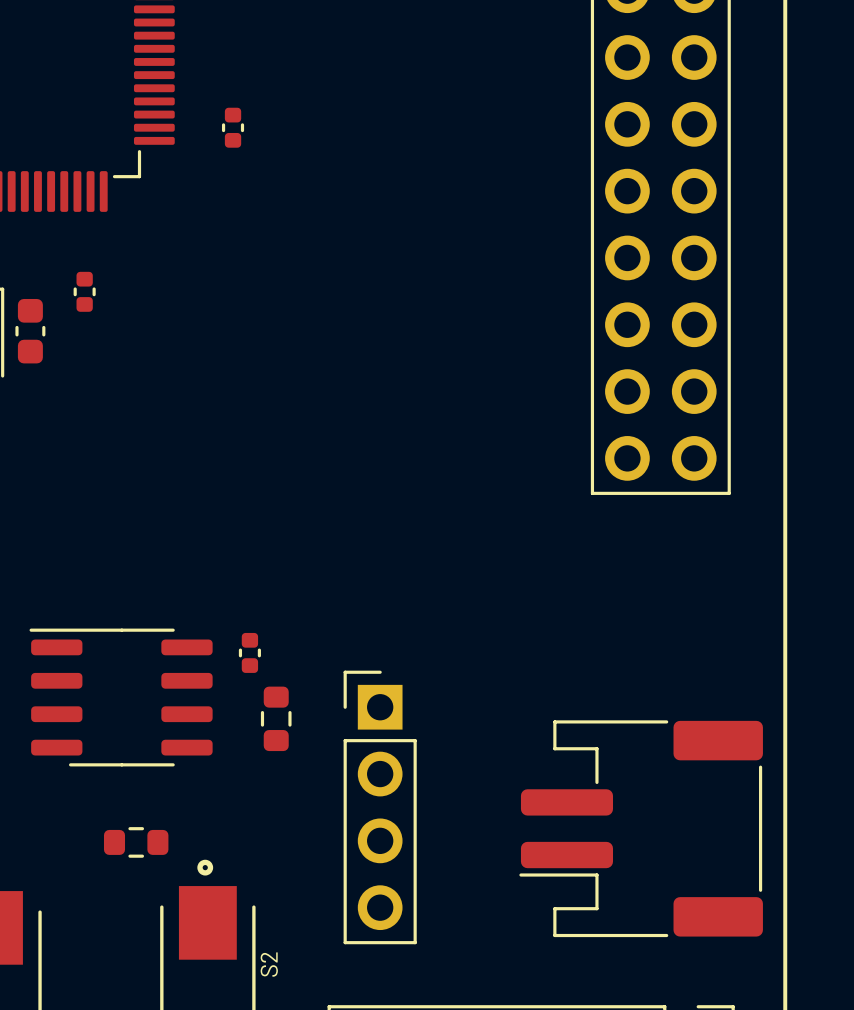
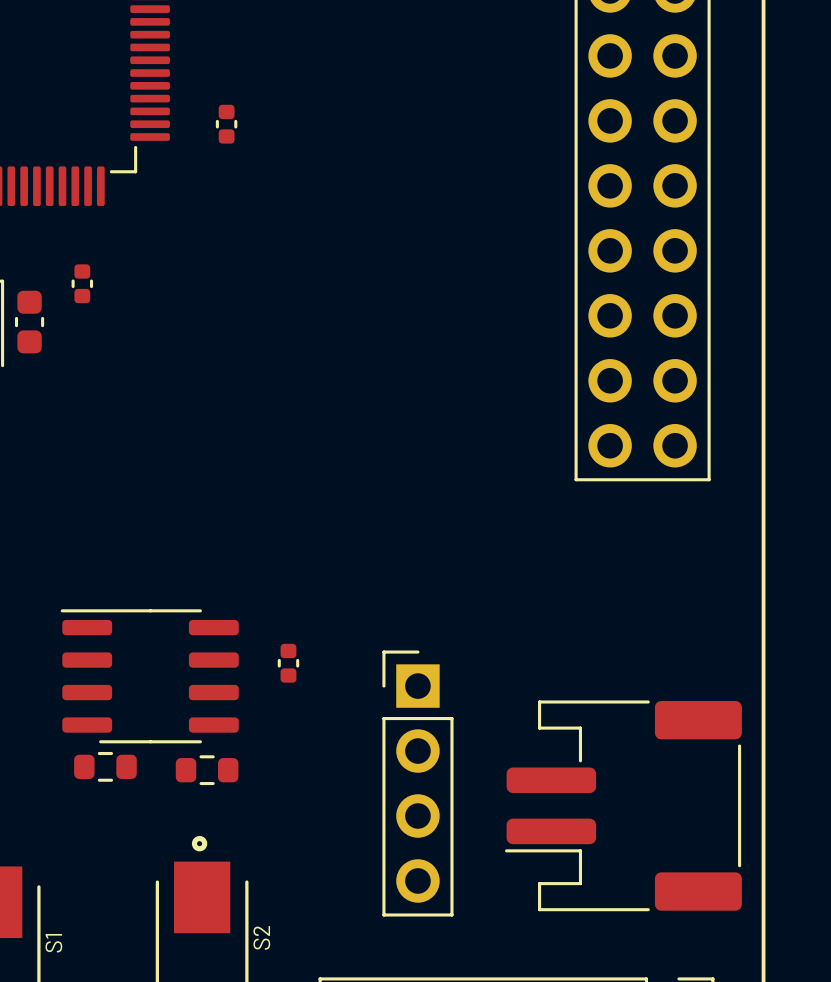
part position: (249, 652) -> (288, 663)
part position: (121, 697) -> (149, 676)
part: (276, 718) -> none
part: none -> (105, 766)
part: none -> (207, 770)
part position: (380, 807) -> (417, 783)
part: (136, 842) -> none
S1 name: none -> S1 (53, 943)

